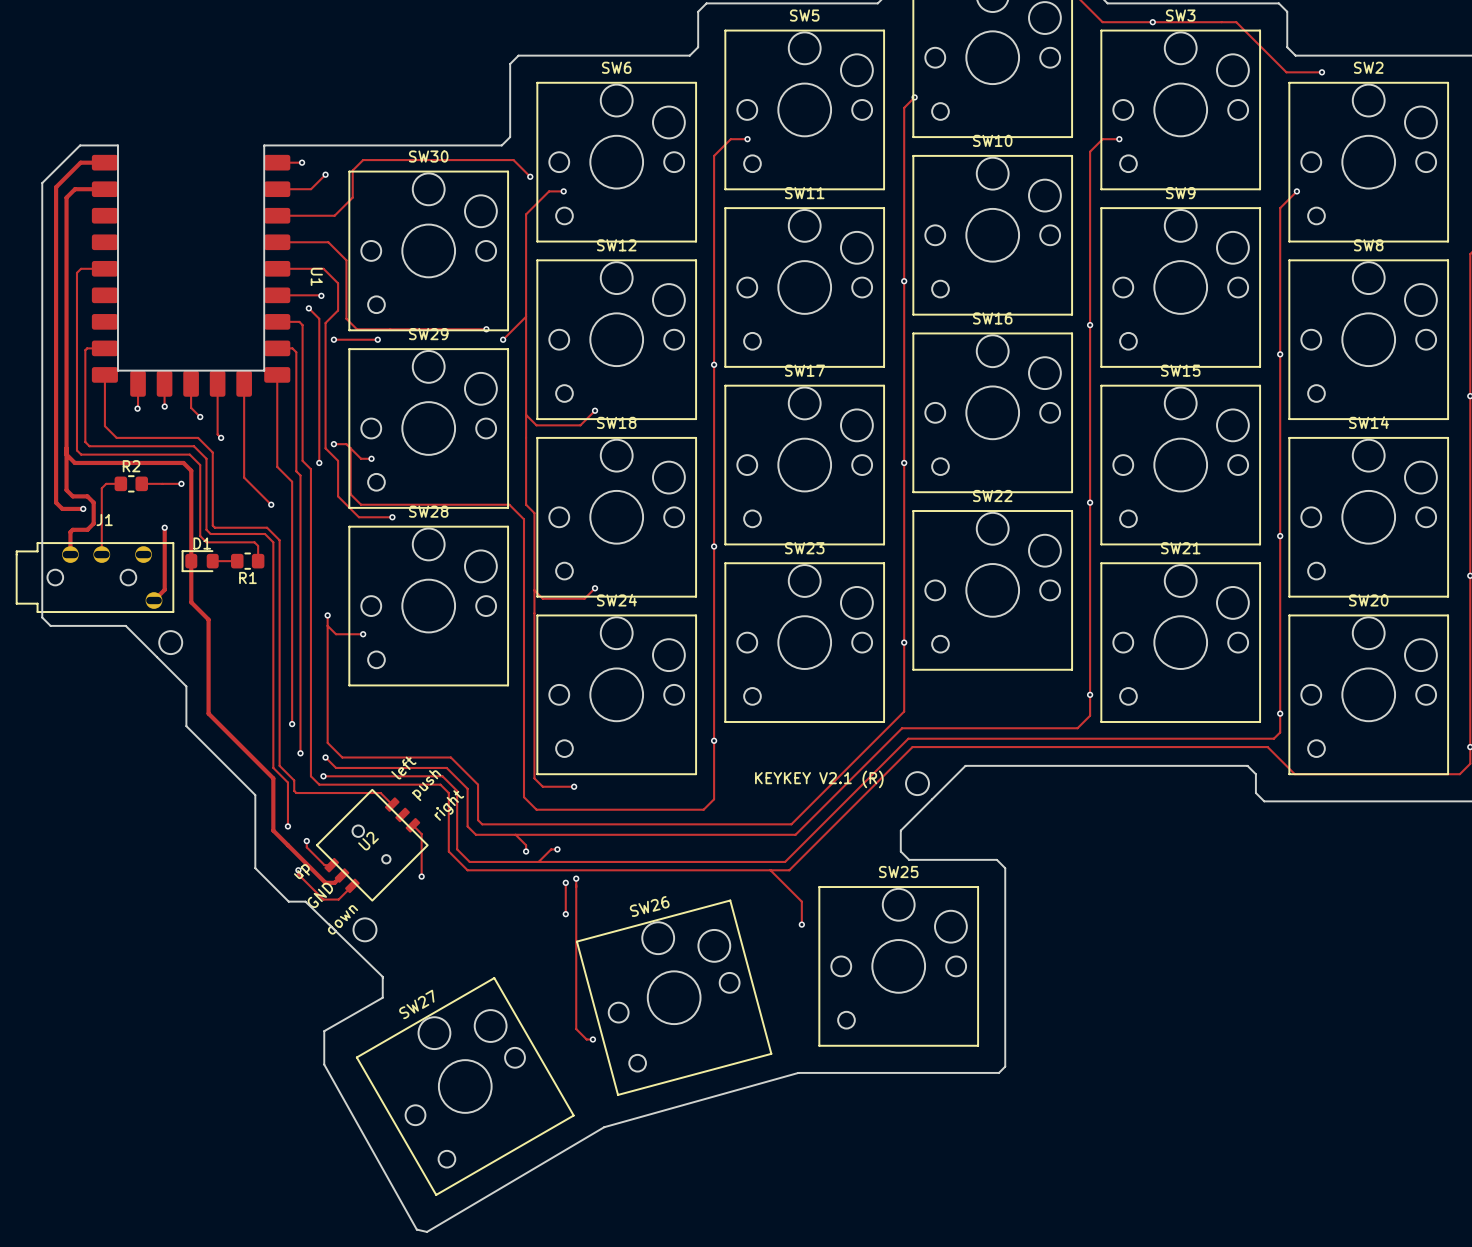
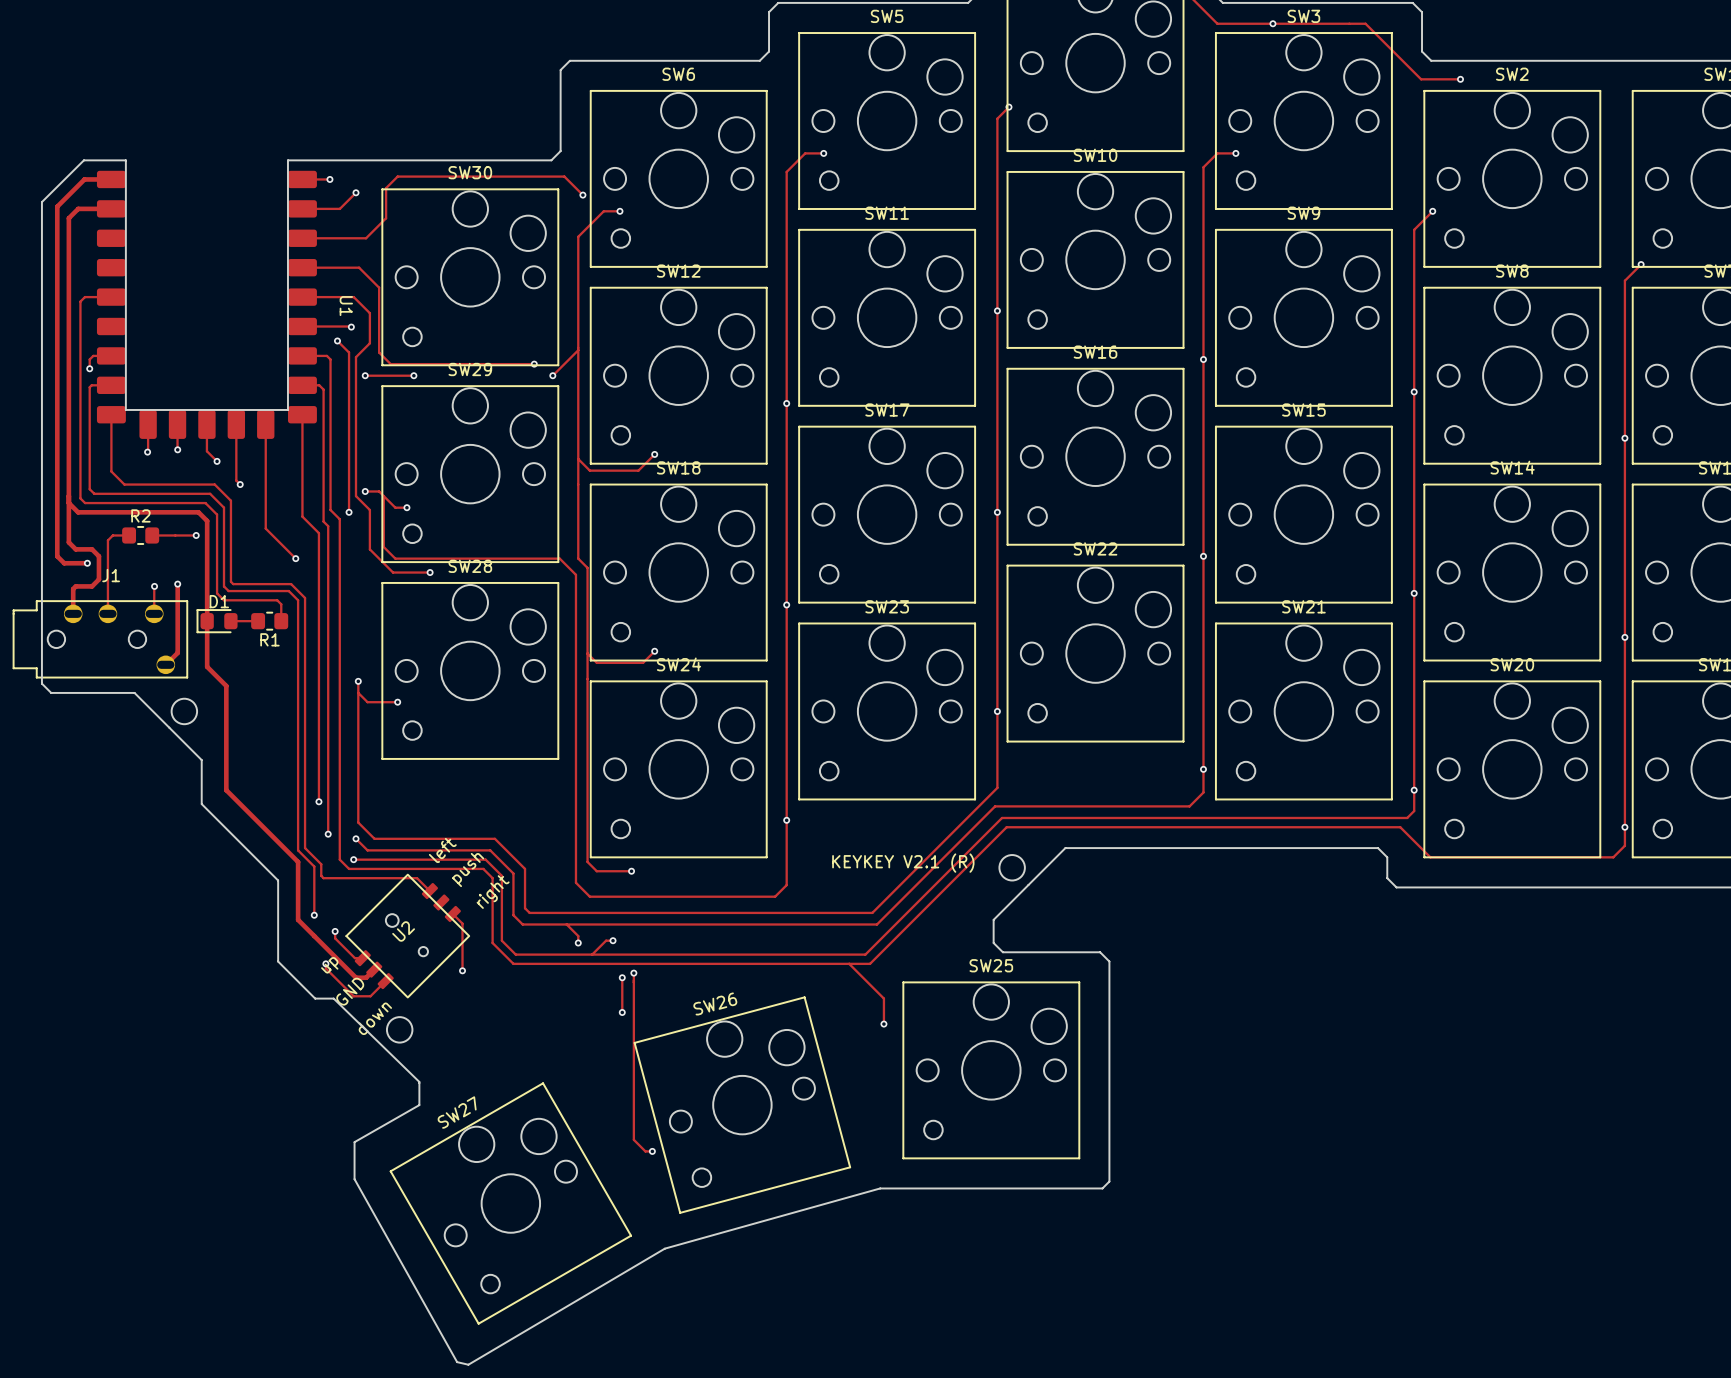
track: none -> (111, 355) (93, 355) (89, 359) (89, 368)
via: none -> (89, 368)
track: none -> (154, 586) (154, 613)
via: none -> (154, 586)

